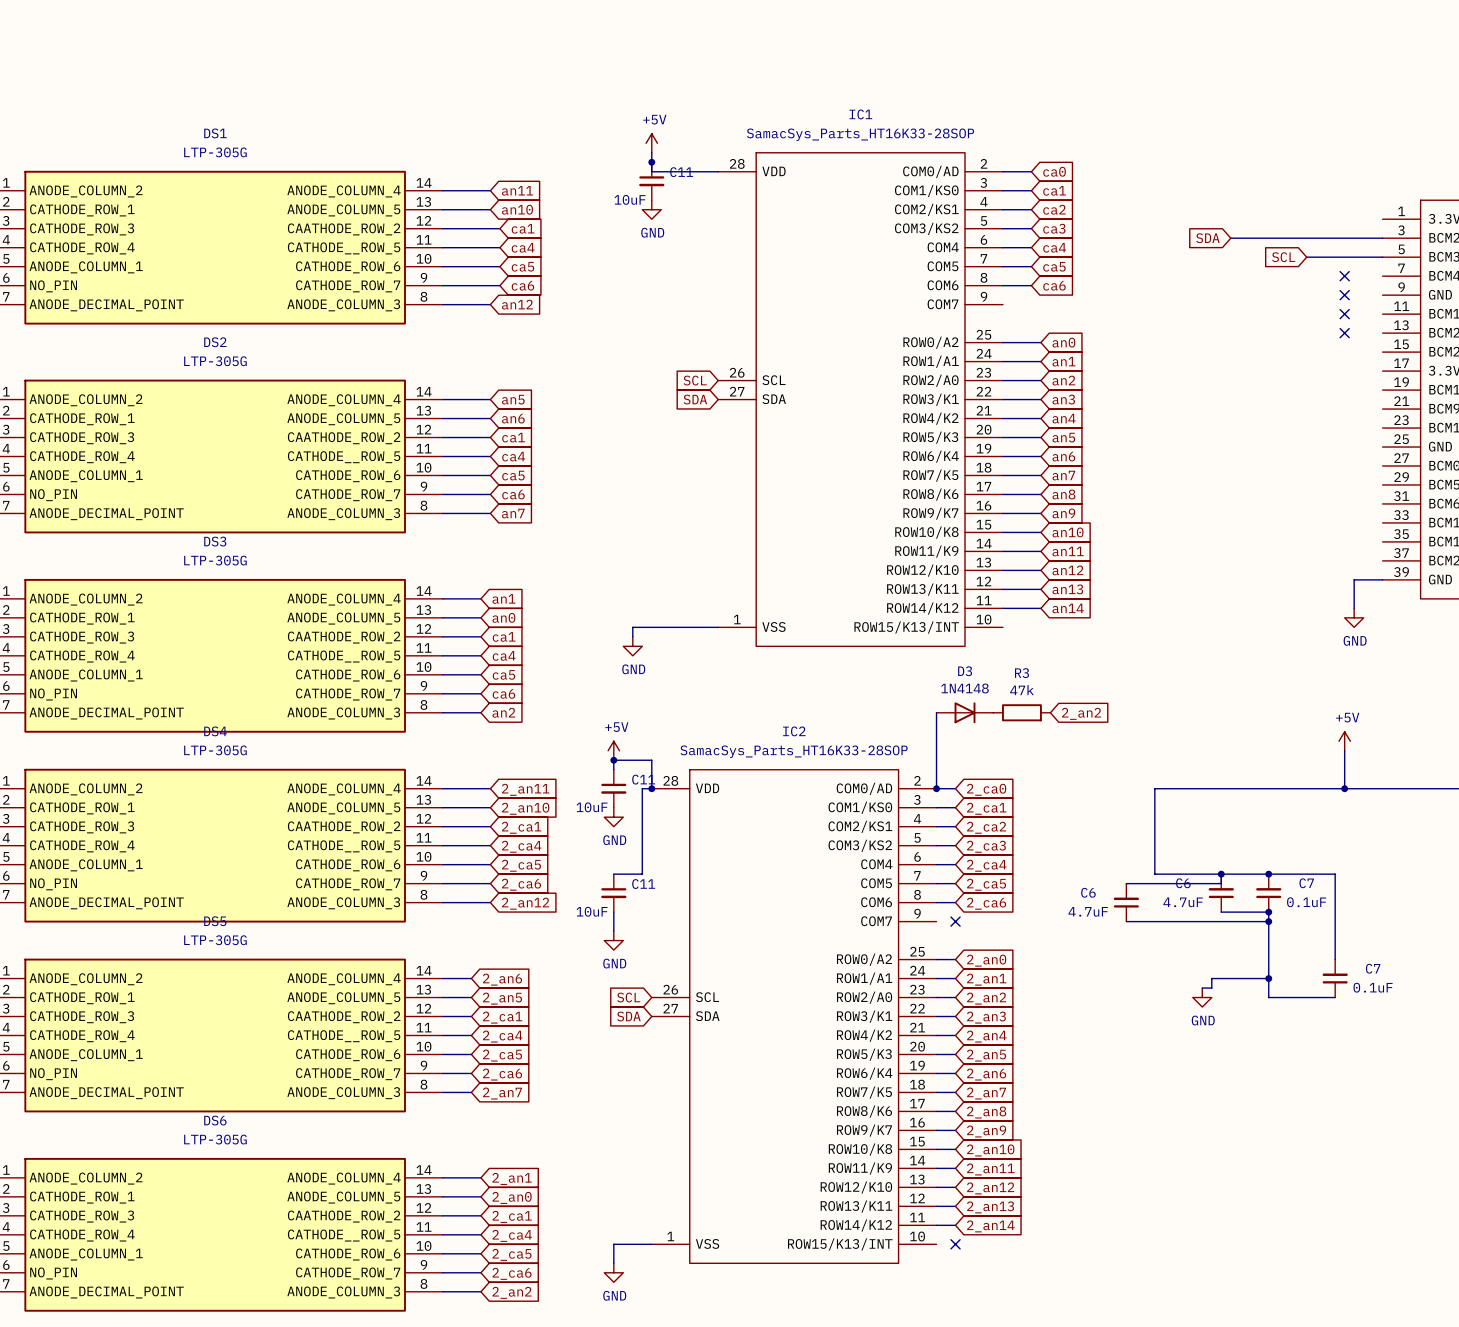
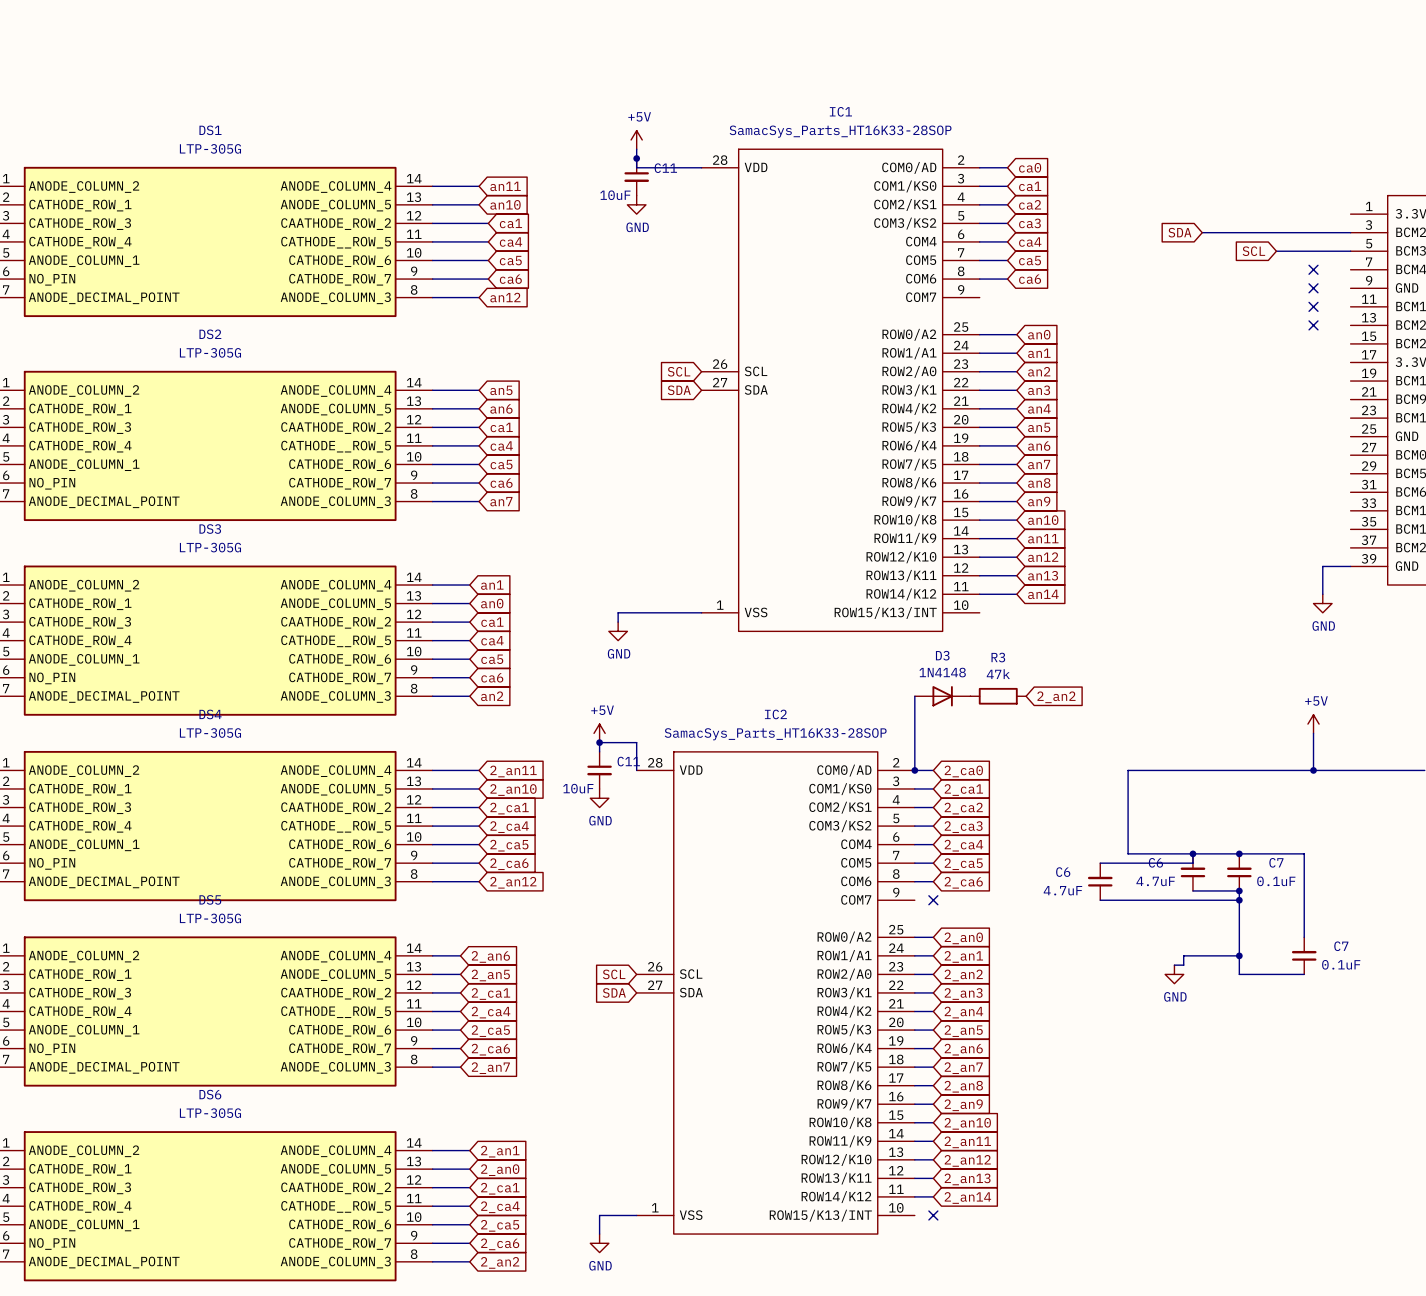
wire: (651, 788) (642, 788) (642, 874) (613, 874) -> none
junction: (651, 788) -> none
C11: 10uF (613, 893) -> none
wire: (613, 912) (613, 931) -> none
power symbol: GND (613, 940) -> none

